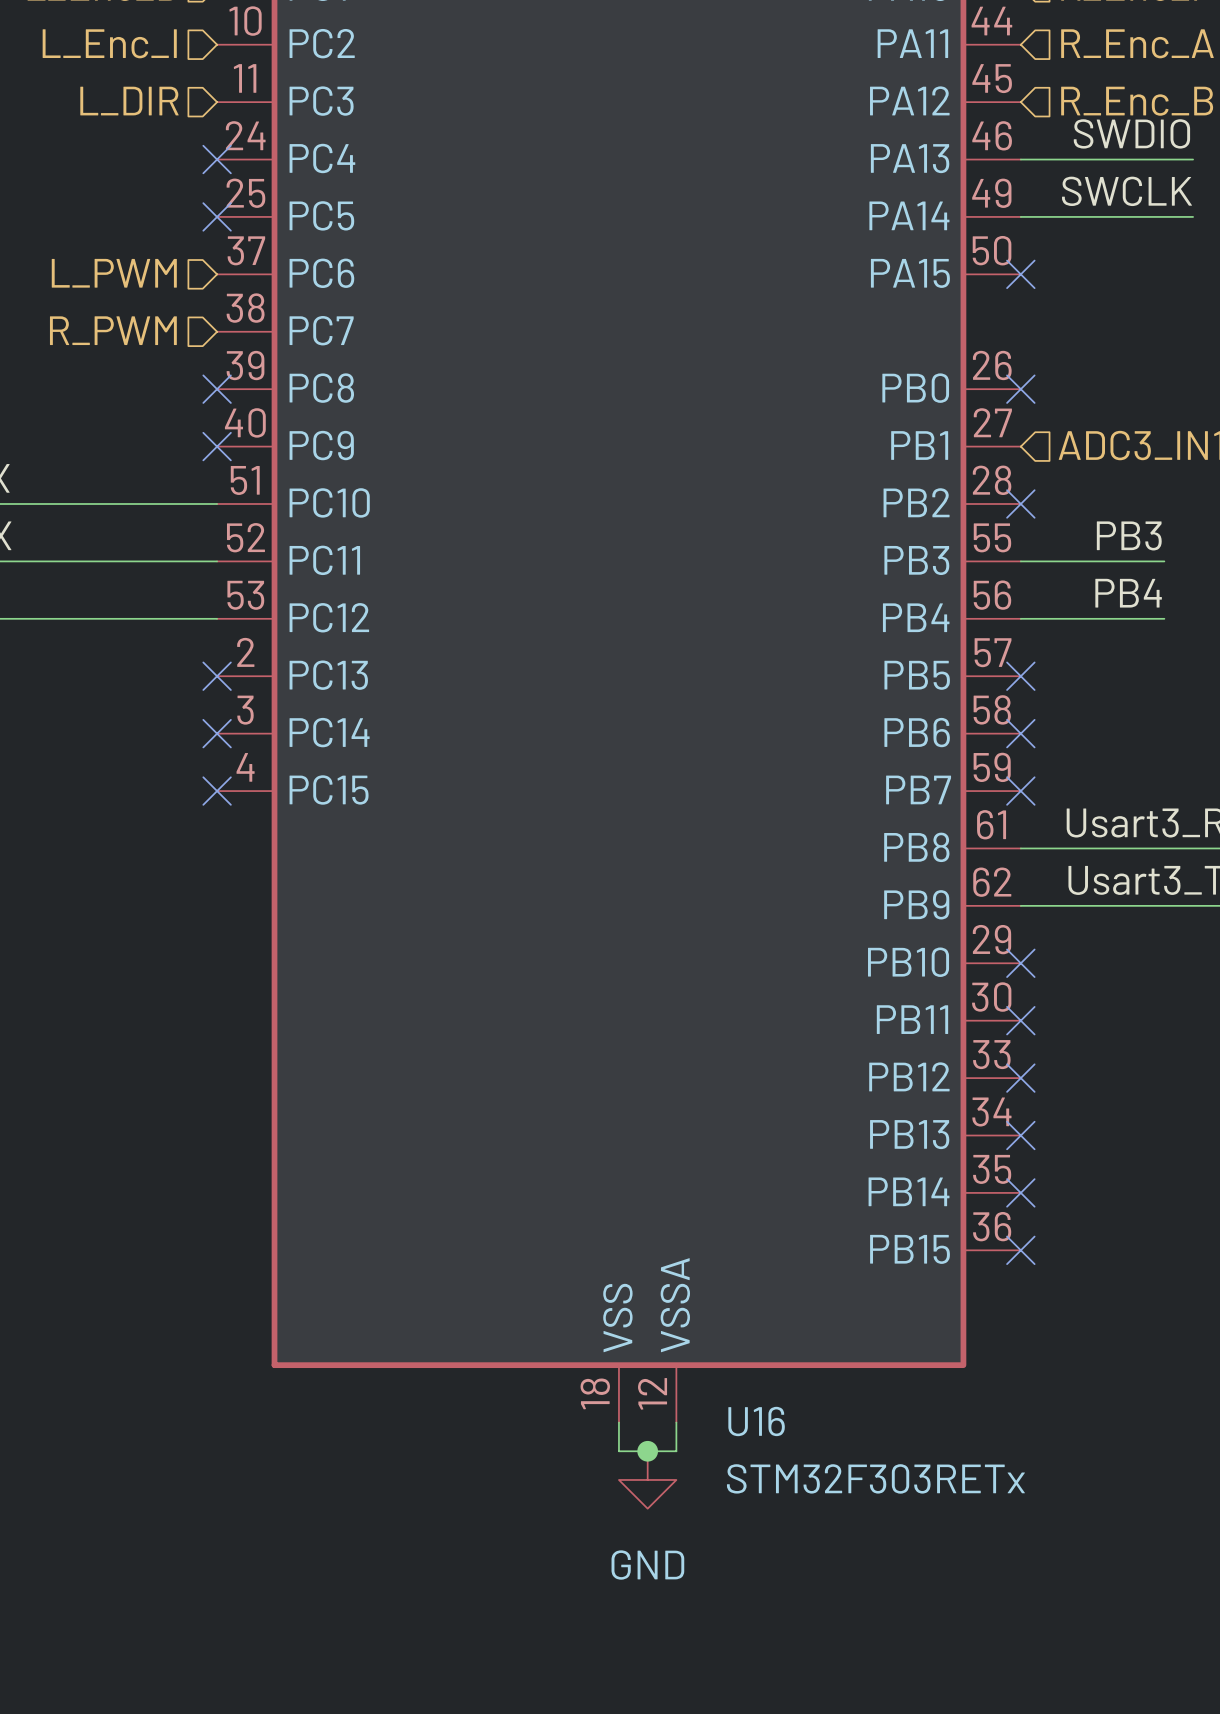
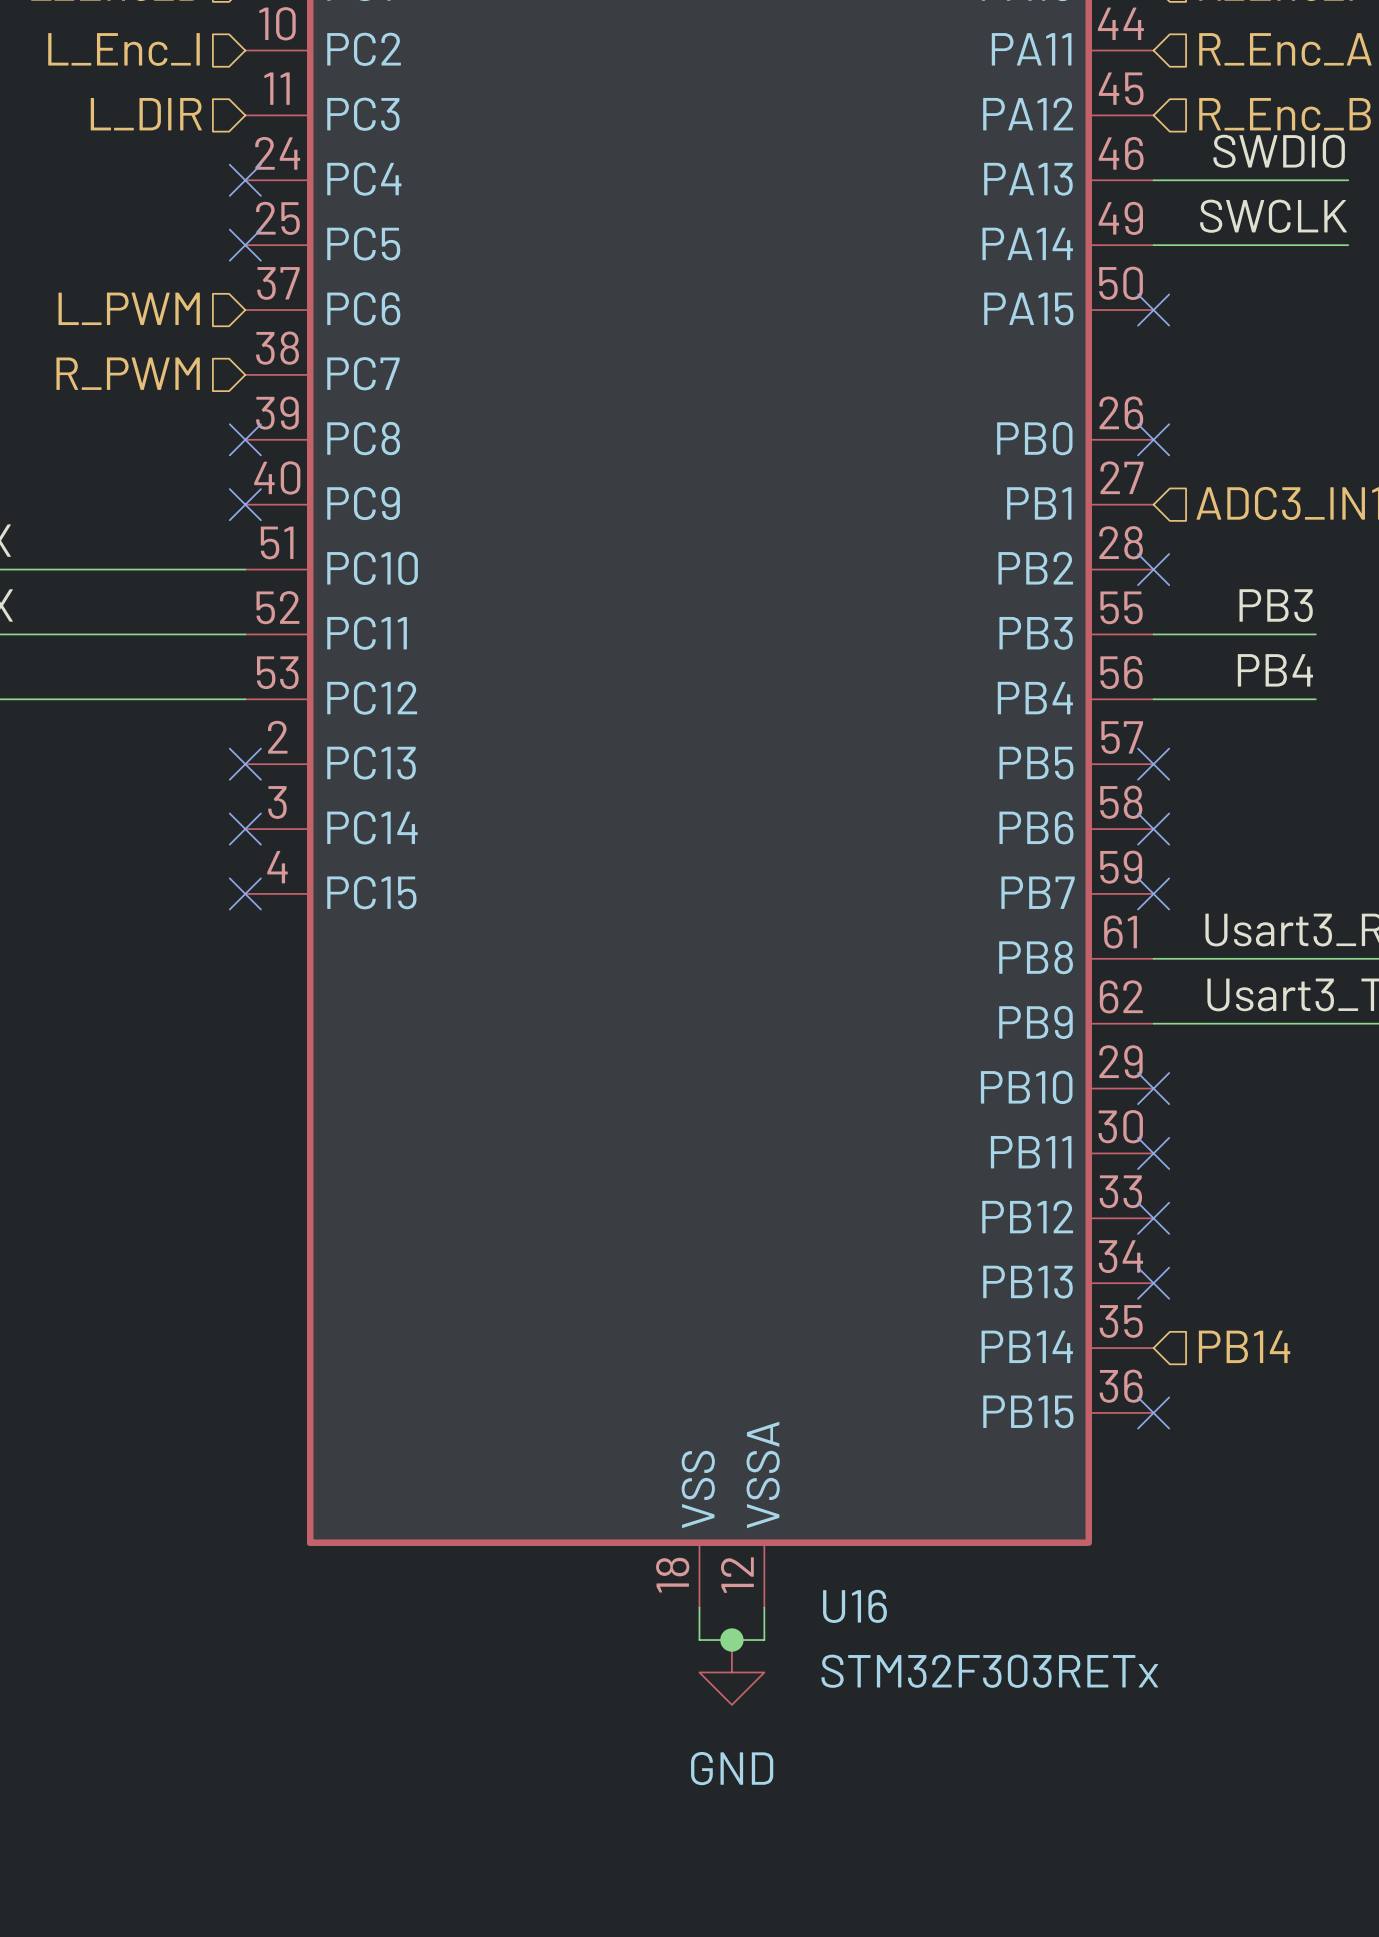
hierarchical label: none -> PB14 (1244, 1346)
no-connect mark: (1020, 1192) -> none

